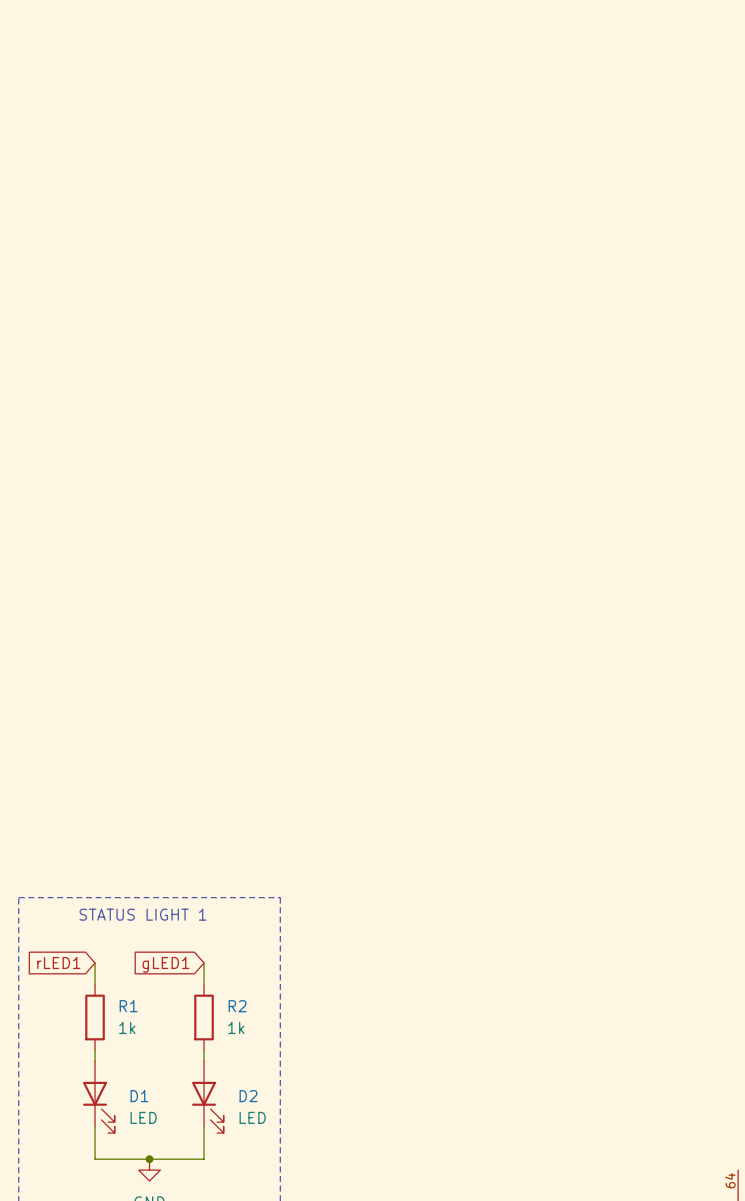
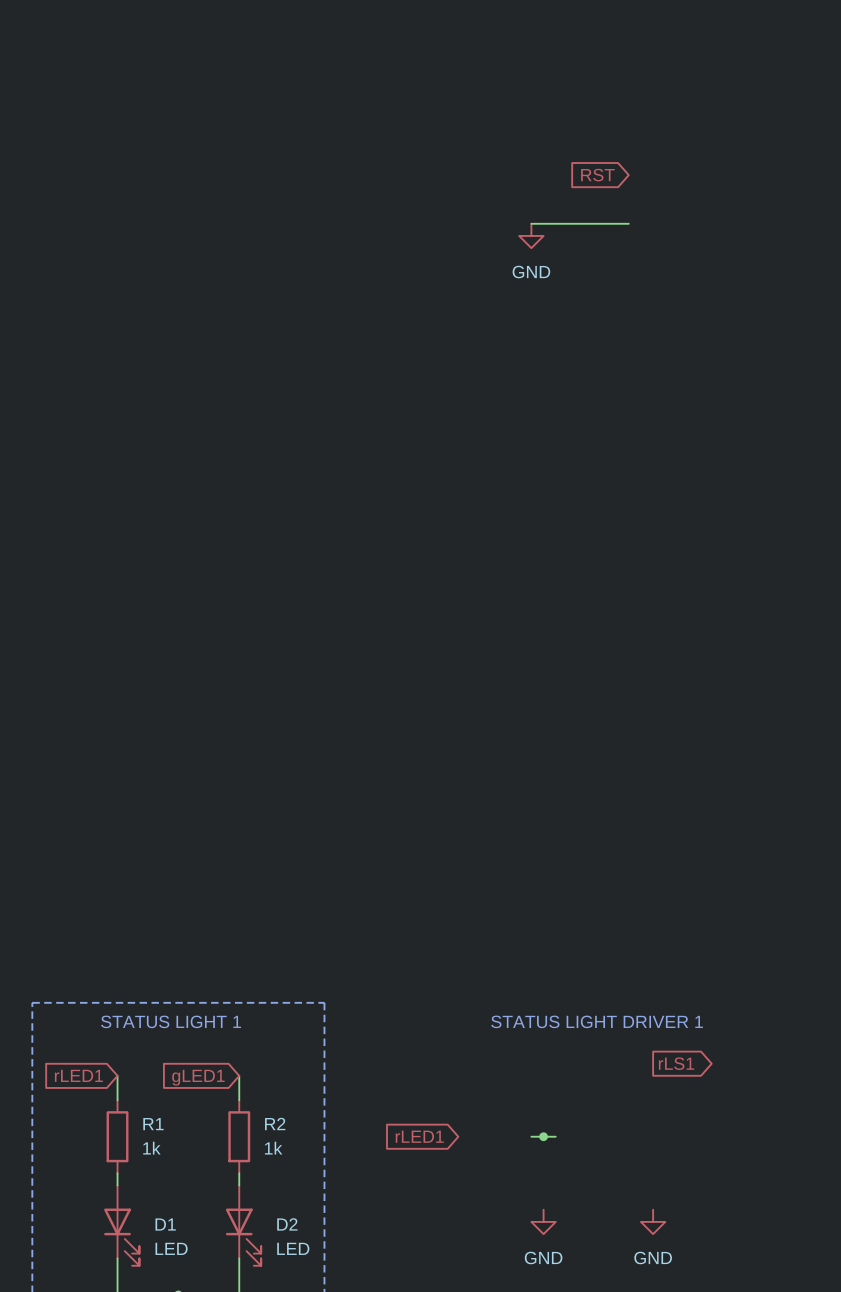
global label: none -> RST (597, 175)
wire: none -> (531, 223) (628, 223)
power symbol: none -> GND (531, 235)
text: none -> STATUS LIGHT DRIVER 1 (597, 1021)
global label: none -> rLS1 (676, 1063)
global label: none -> rLED1 (419, 1136)
wire: none -> (531, 1136) (555, 1136)
junction: none -> (543, 1136)
power symbol: none -> GND (543, 1221)
power symbol: none -> GND (653, 1221)

